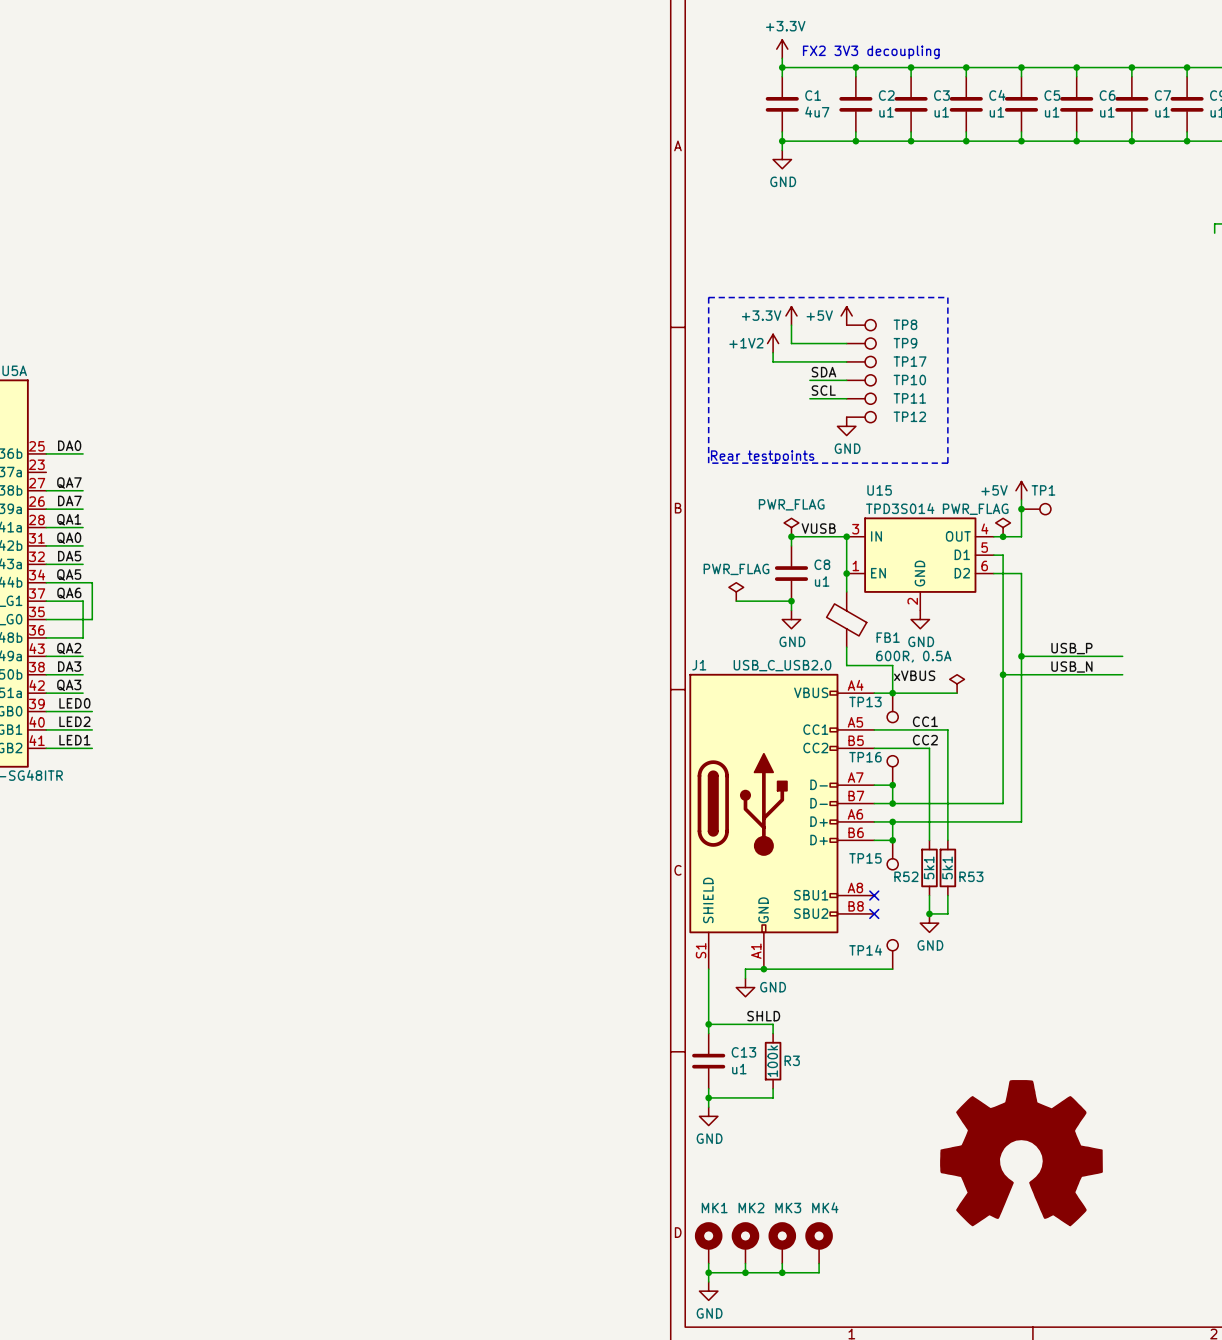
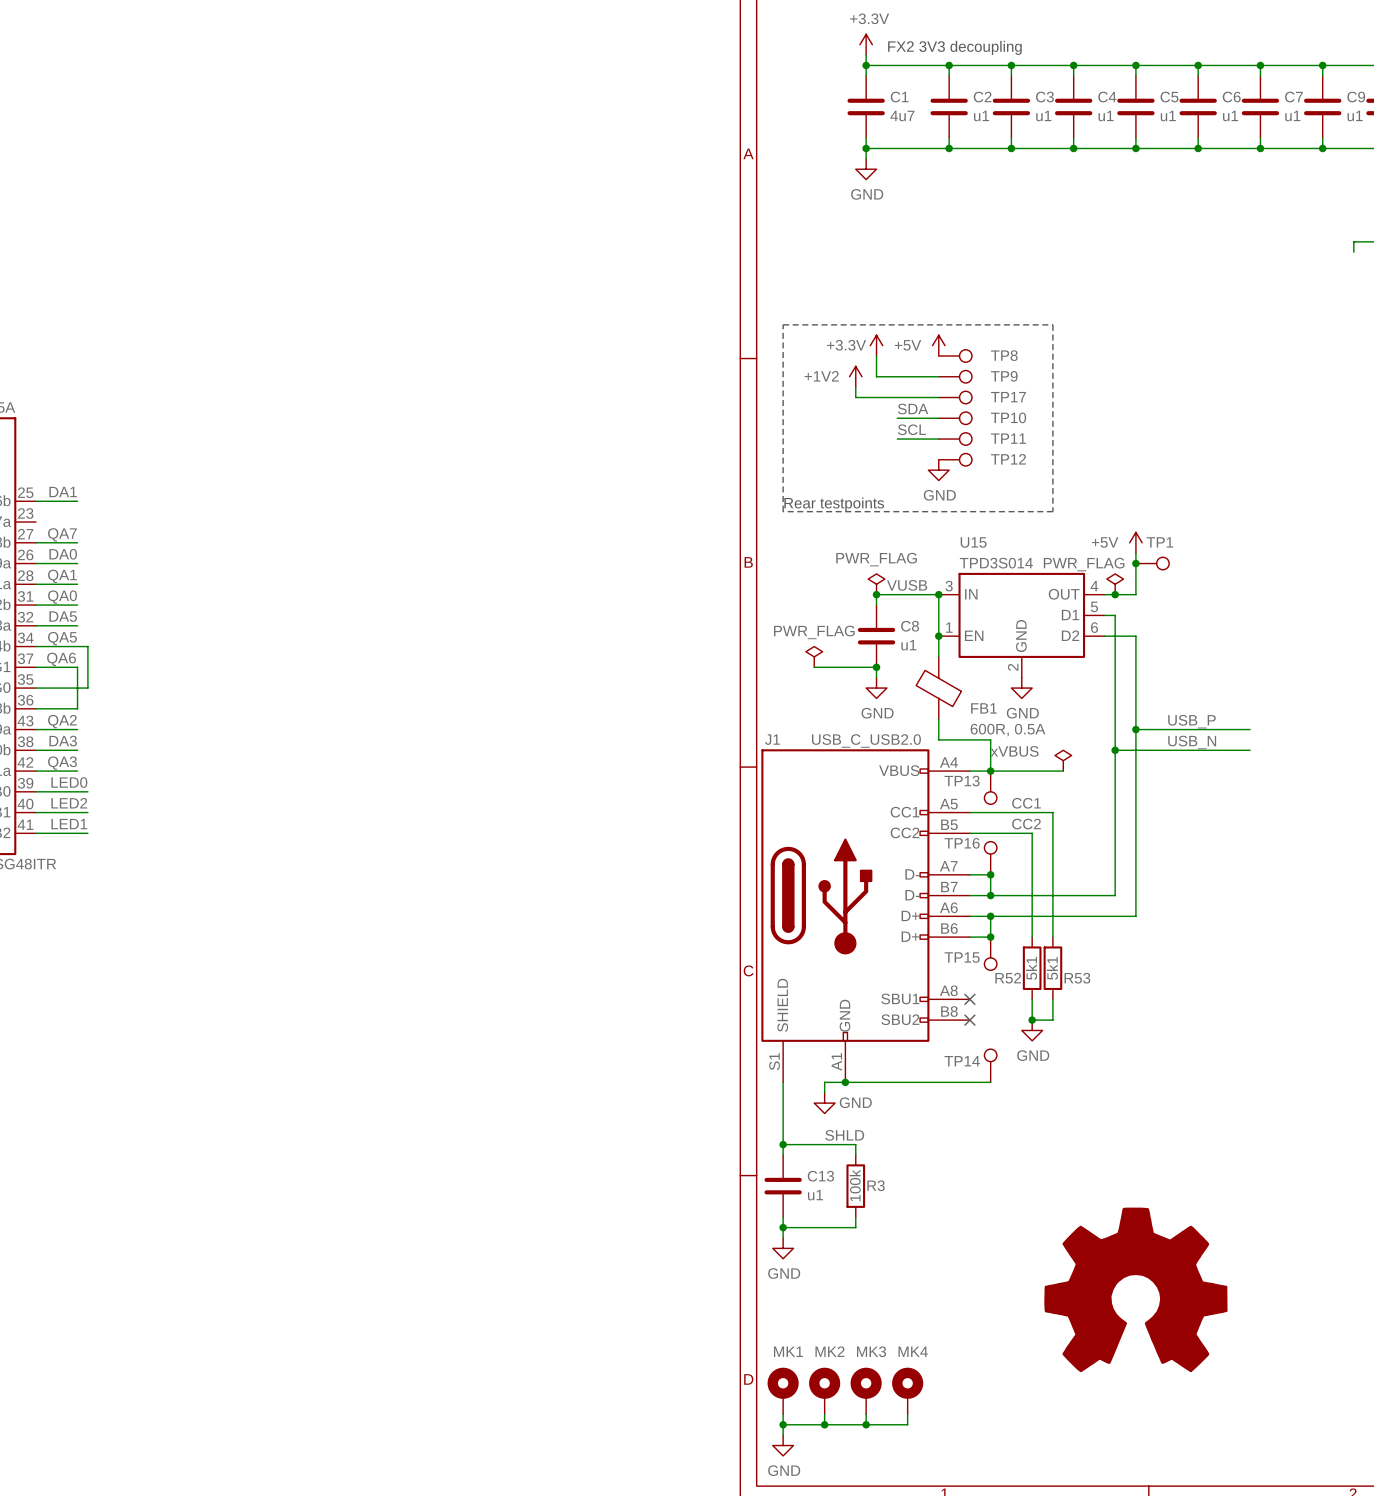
label: DA0 (69, 445) -> DA1 (63, 492)
label: DA7 (69, 500) -> DA0 (63, 554)

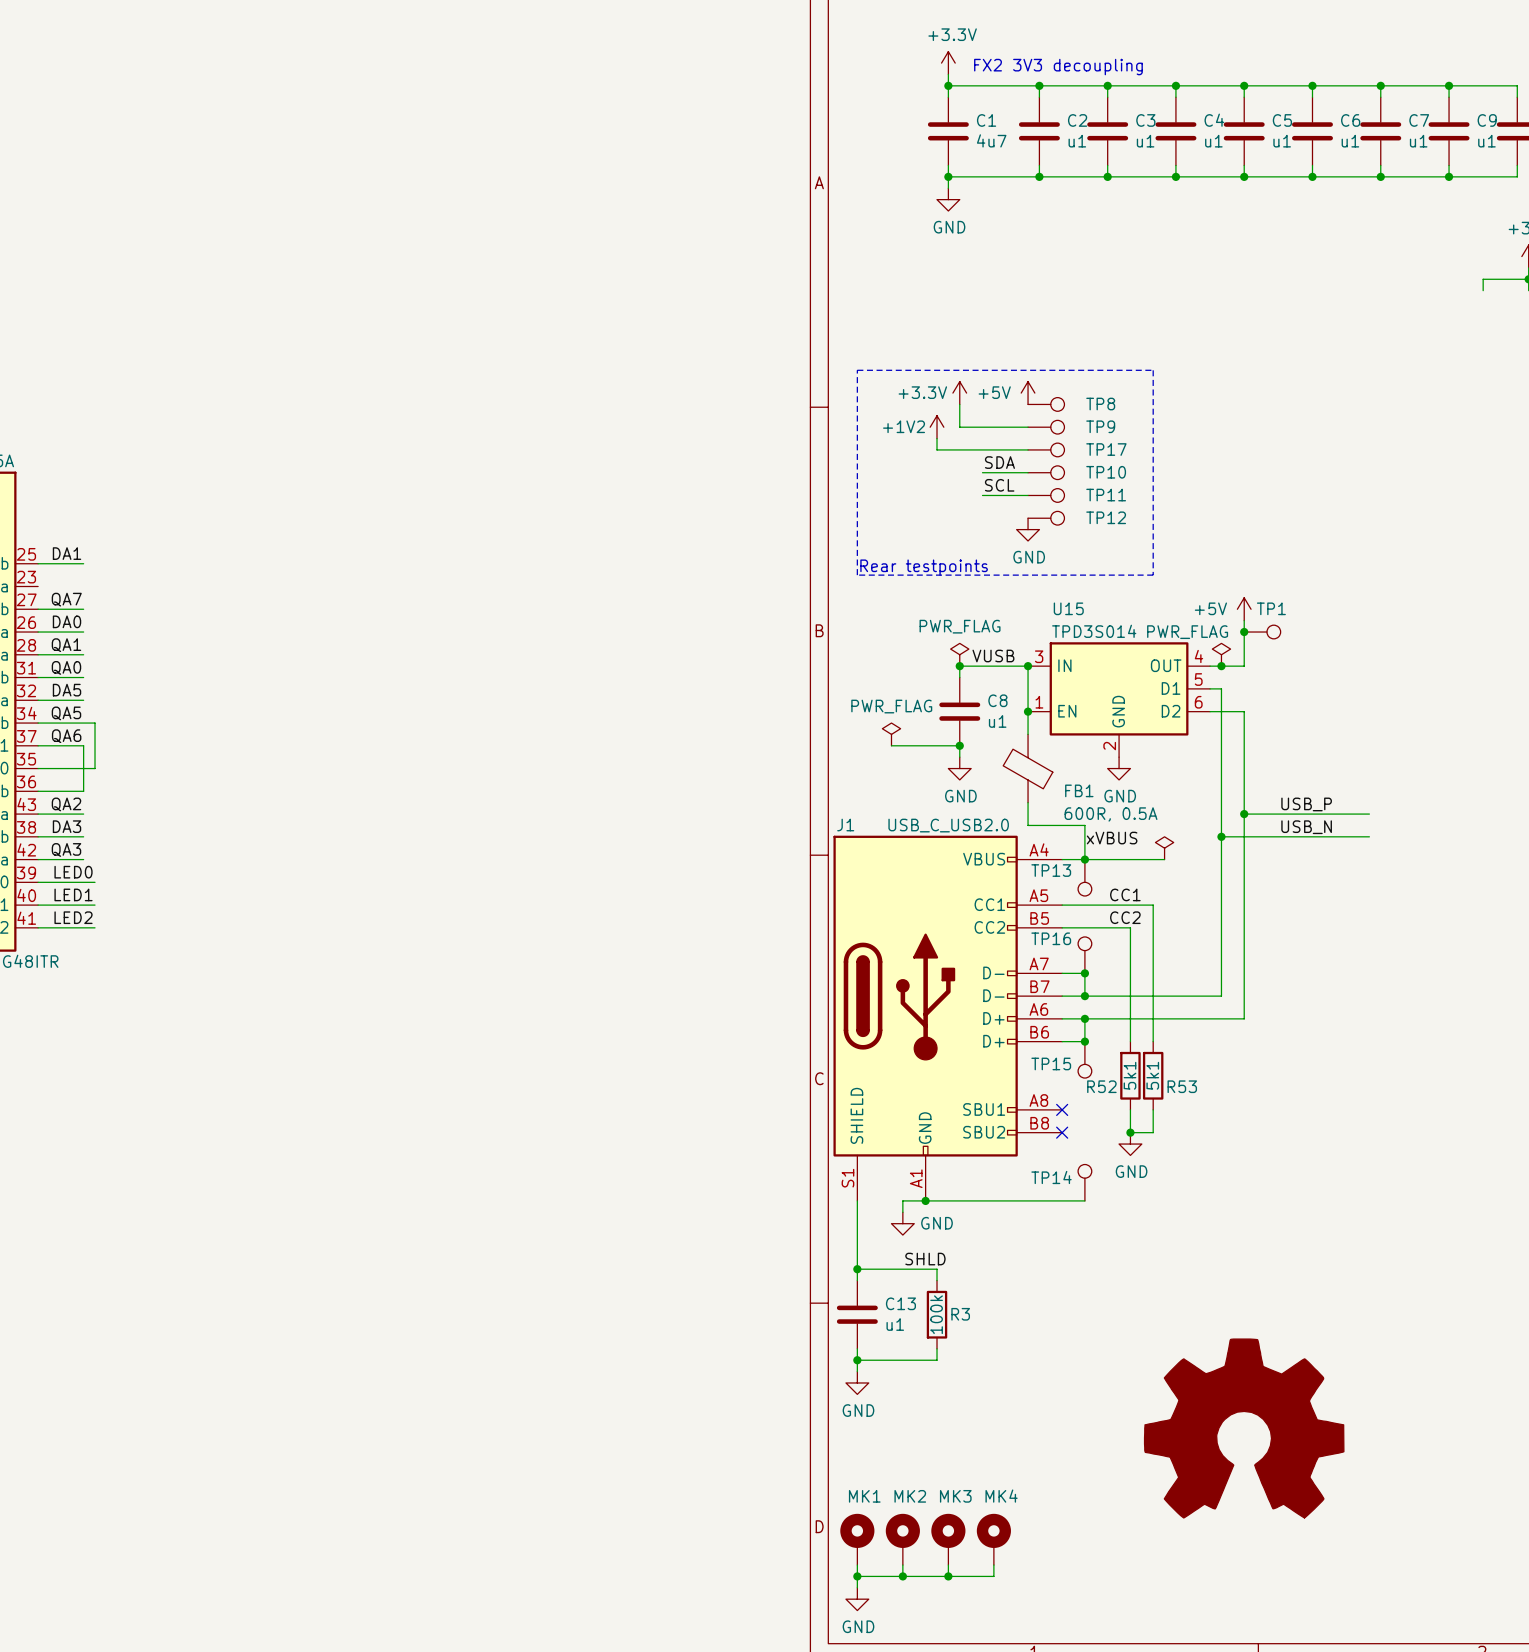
label: LED2 (69, 803) -> LED1 (73, 894)
label: LED1 (69, 824) -> LED2 (73, 917)

